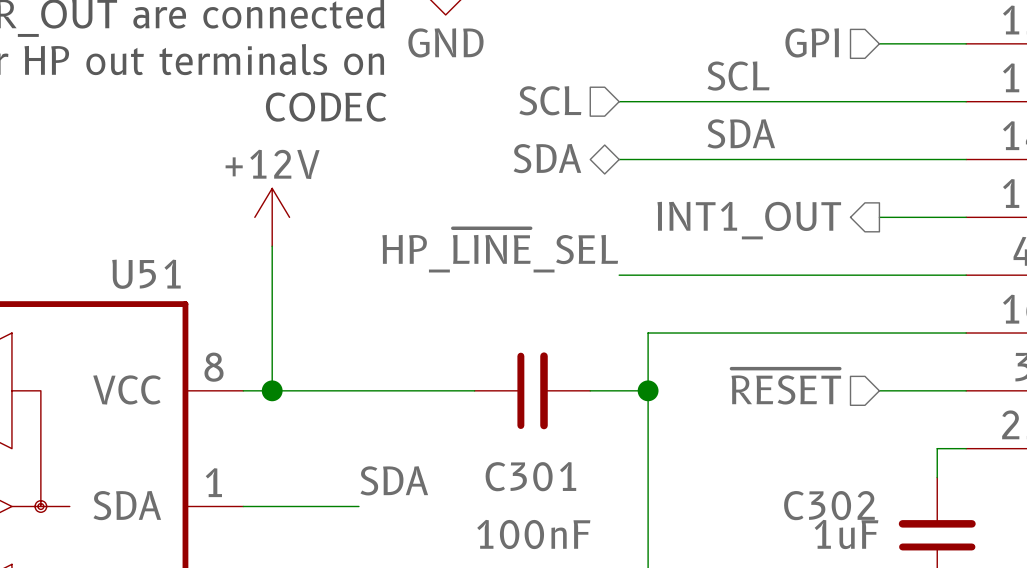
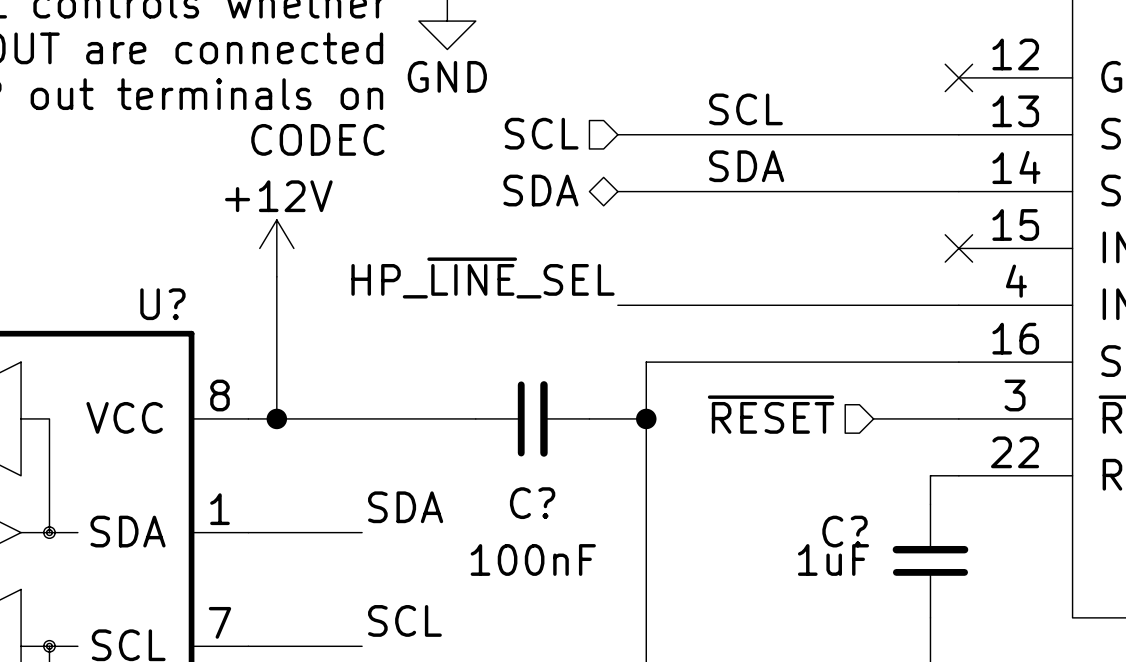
hierarchical label: GPI (812, 42) -> none
wire: (879, 43) (966, 43) -> none
no-connect mark: none -> (958, 77)
wire: (879, 217) (966, 217) -> none
no-connect mark: none -> (958, 248)
hierarchical label: INT1_OUT (749, 220) -> none
U51 name: U51 (146, 274) -> U? (162, 304)
C301 name: C301 (530, 476) -> C? (532, 503)
C302 name: C302 (829, 505) -> C? (845, 531)

